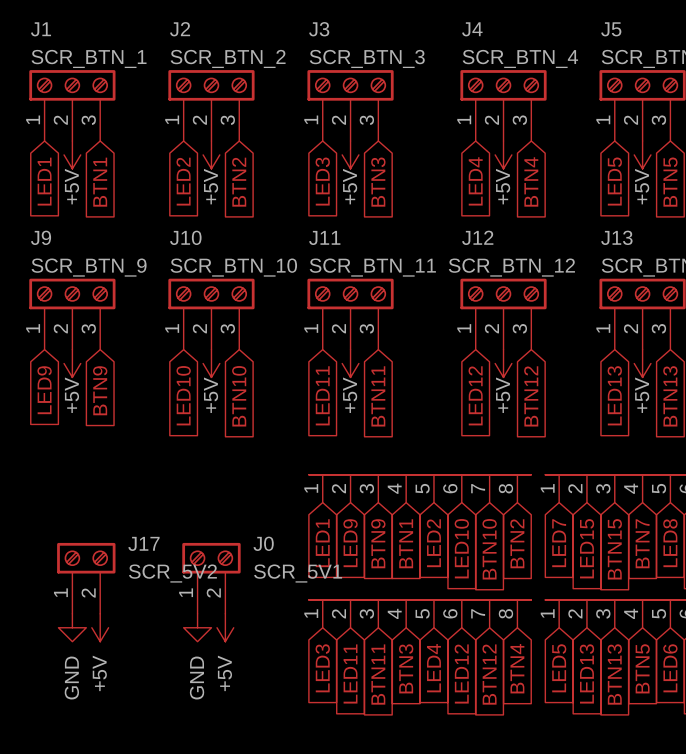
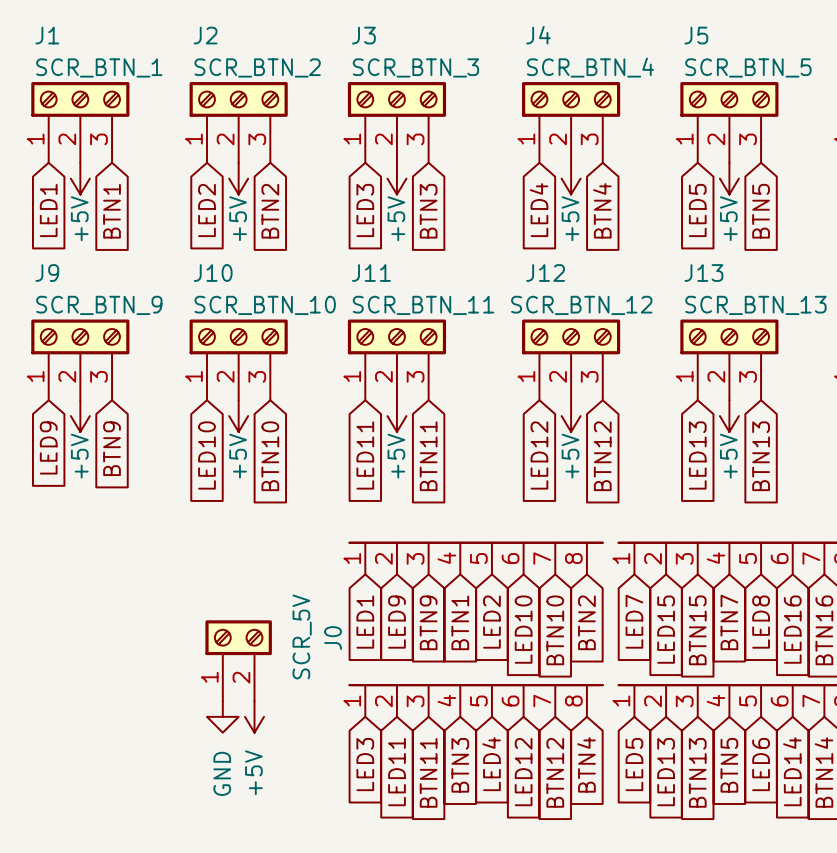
J0 name rotation: 0° (263, 543) -> 90° counterclockwise (333, 638)
J0 value: SCR_5V1 (298, 573) -> SCR_5V (302, 636)
J17: SCR_5V2 (86, 578) -> none
power symbol: GND (72, 627) -> none
power symbol: +5V (100, 627) -> none

